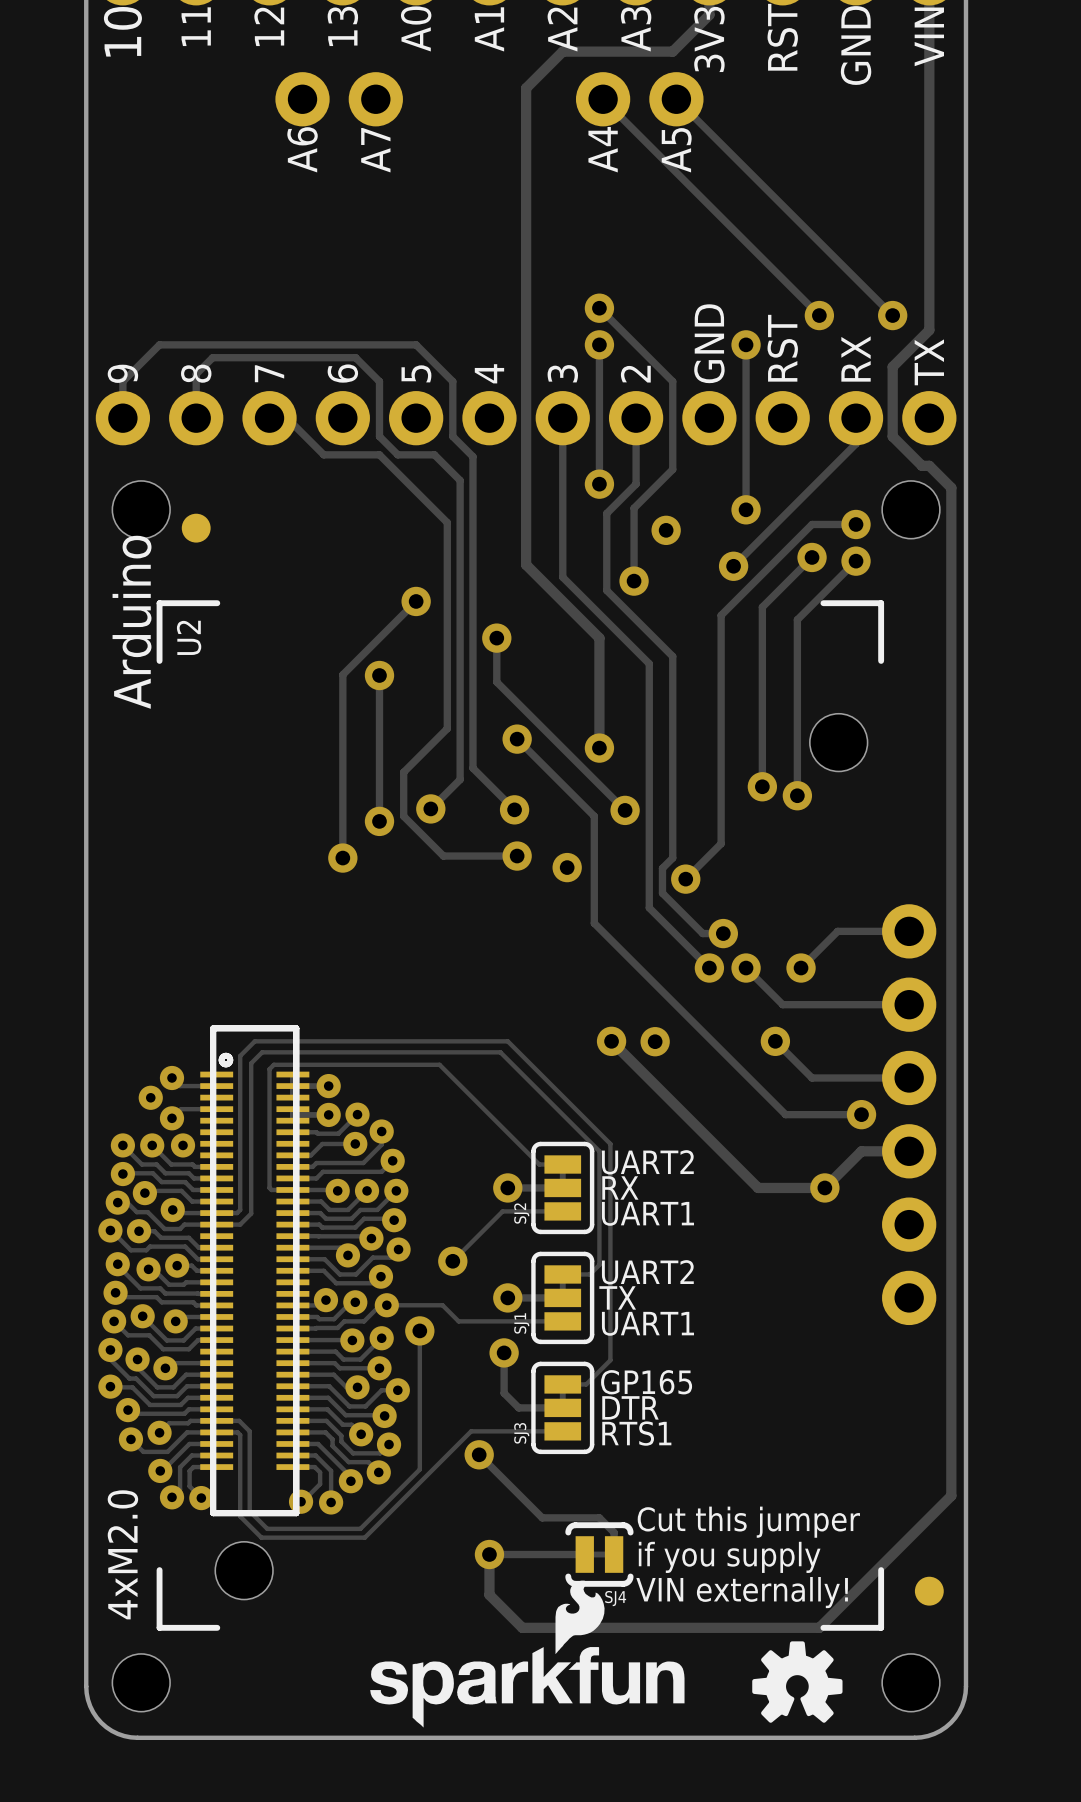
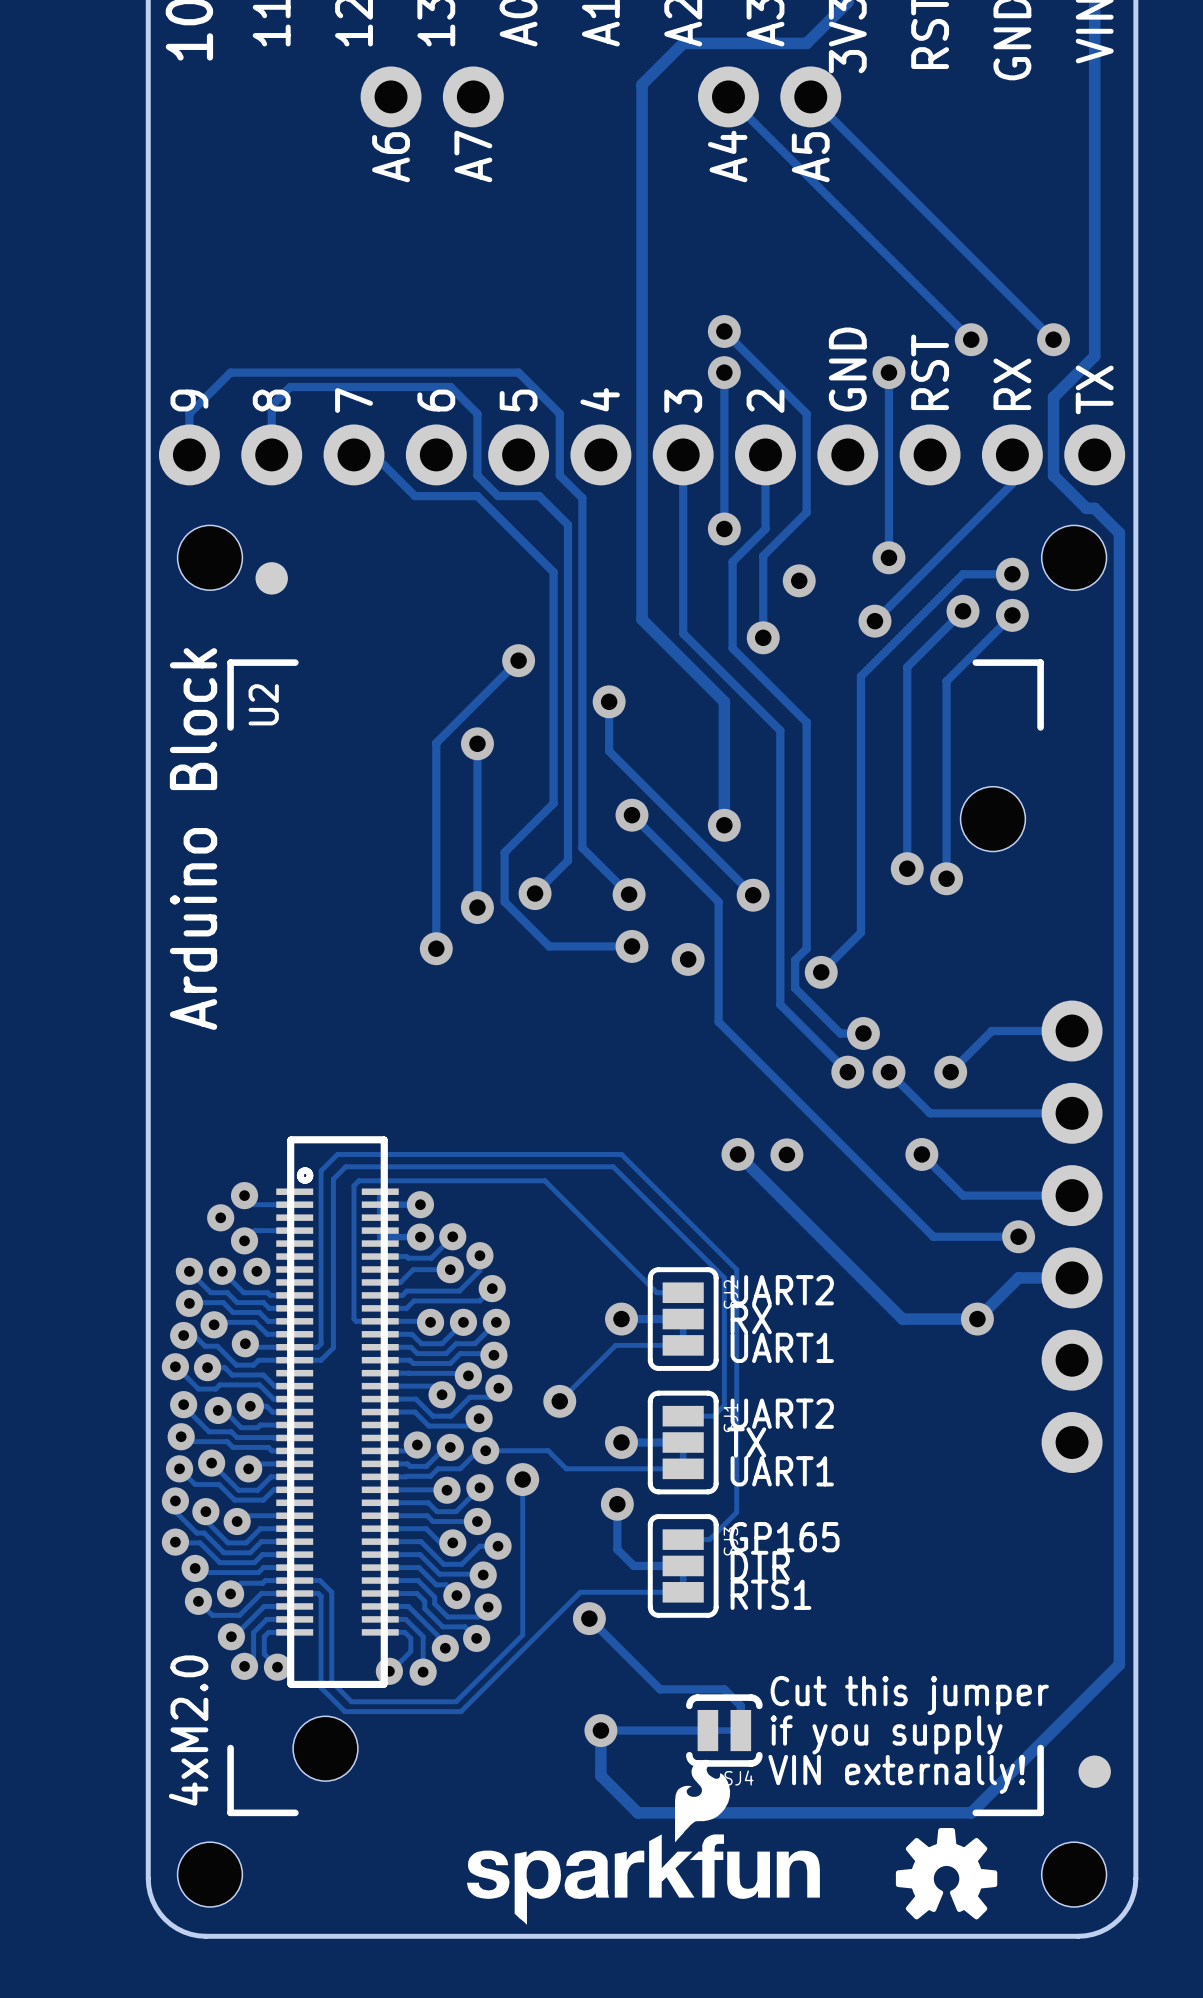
text: Arduino (132, 622) -> Arduino Block (193, 839)
SJ2 rotation: 0° (562, 1187) -> 180° (683, 1319)
SJ1 rotation: 0° (562, 1297) -> 180° (683, 1442)
SJ3 rotation: 0° (562, 1407) -> 180° (683, 1565)

